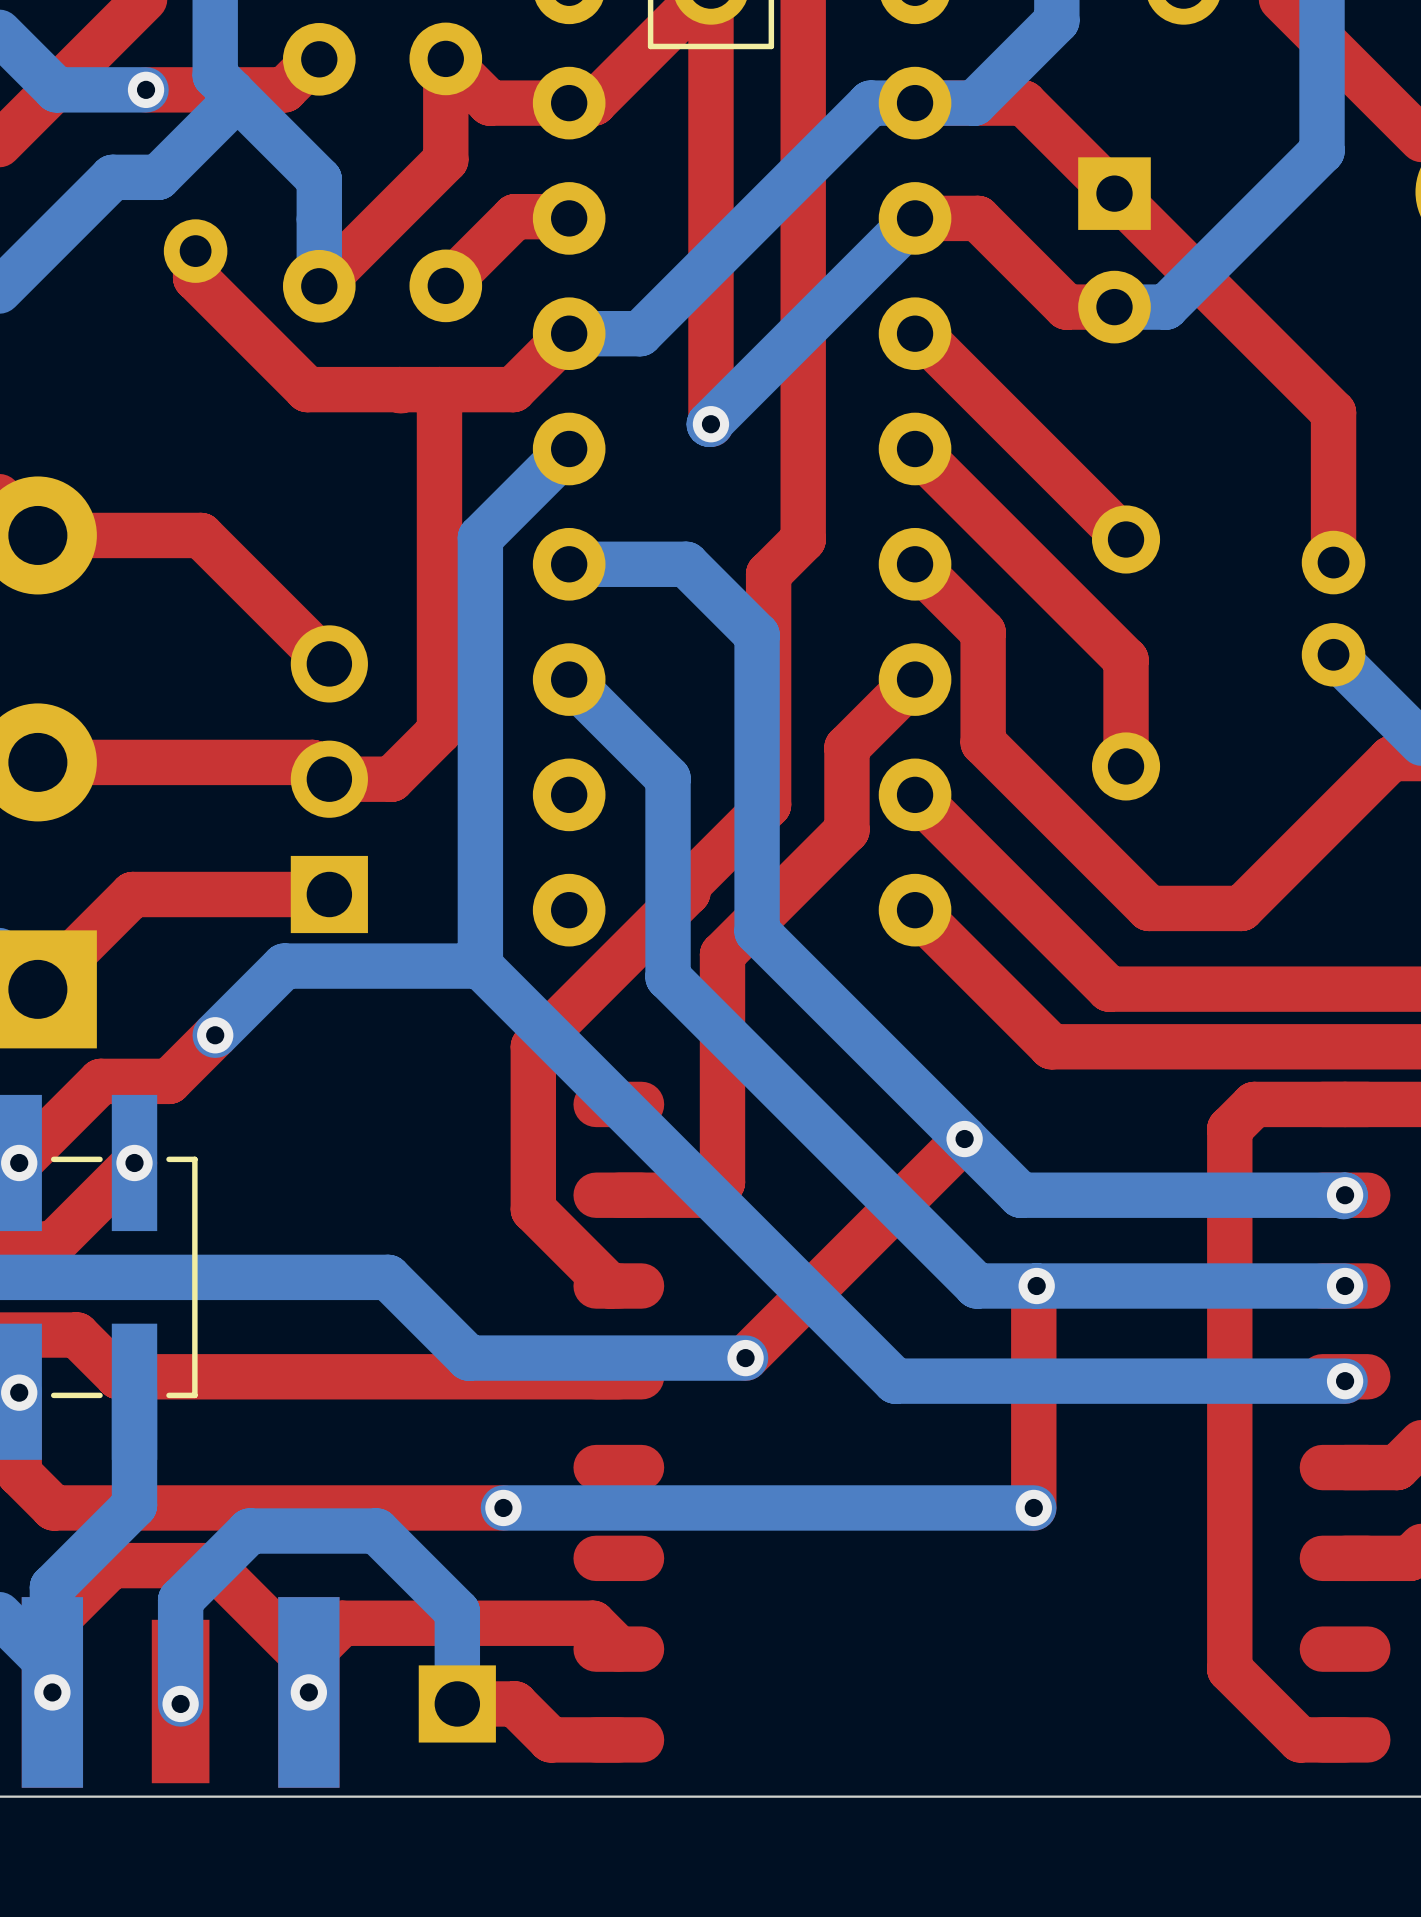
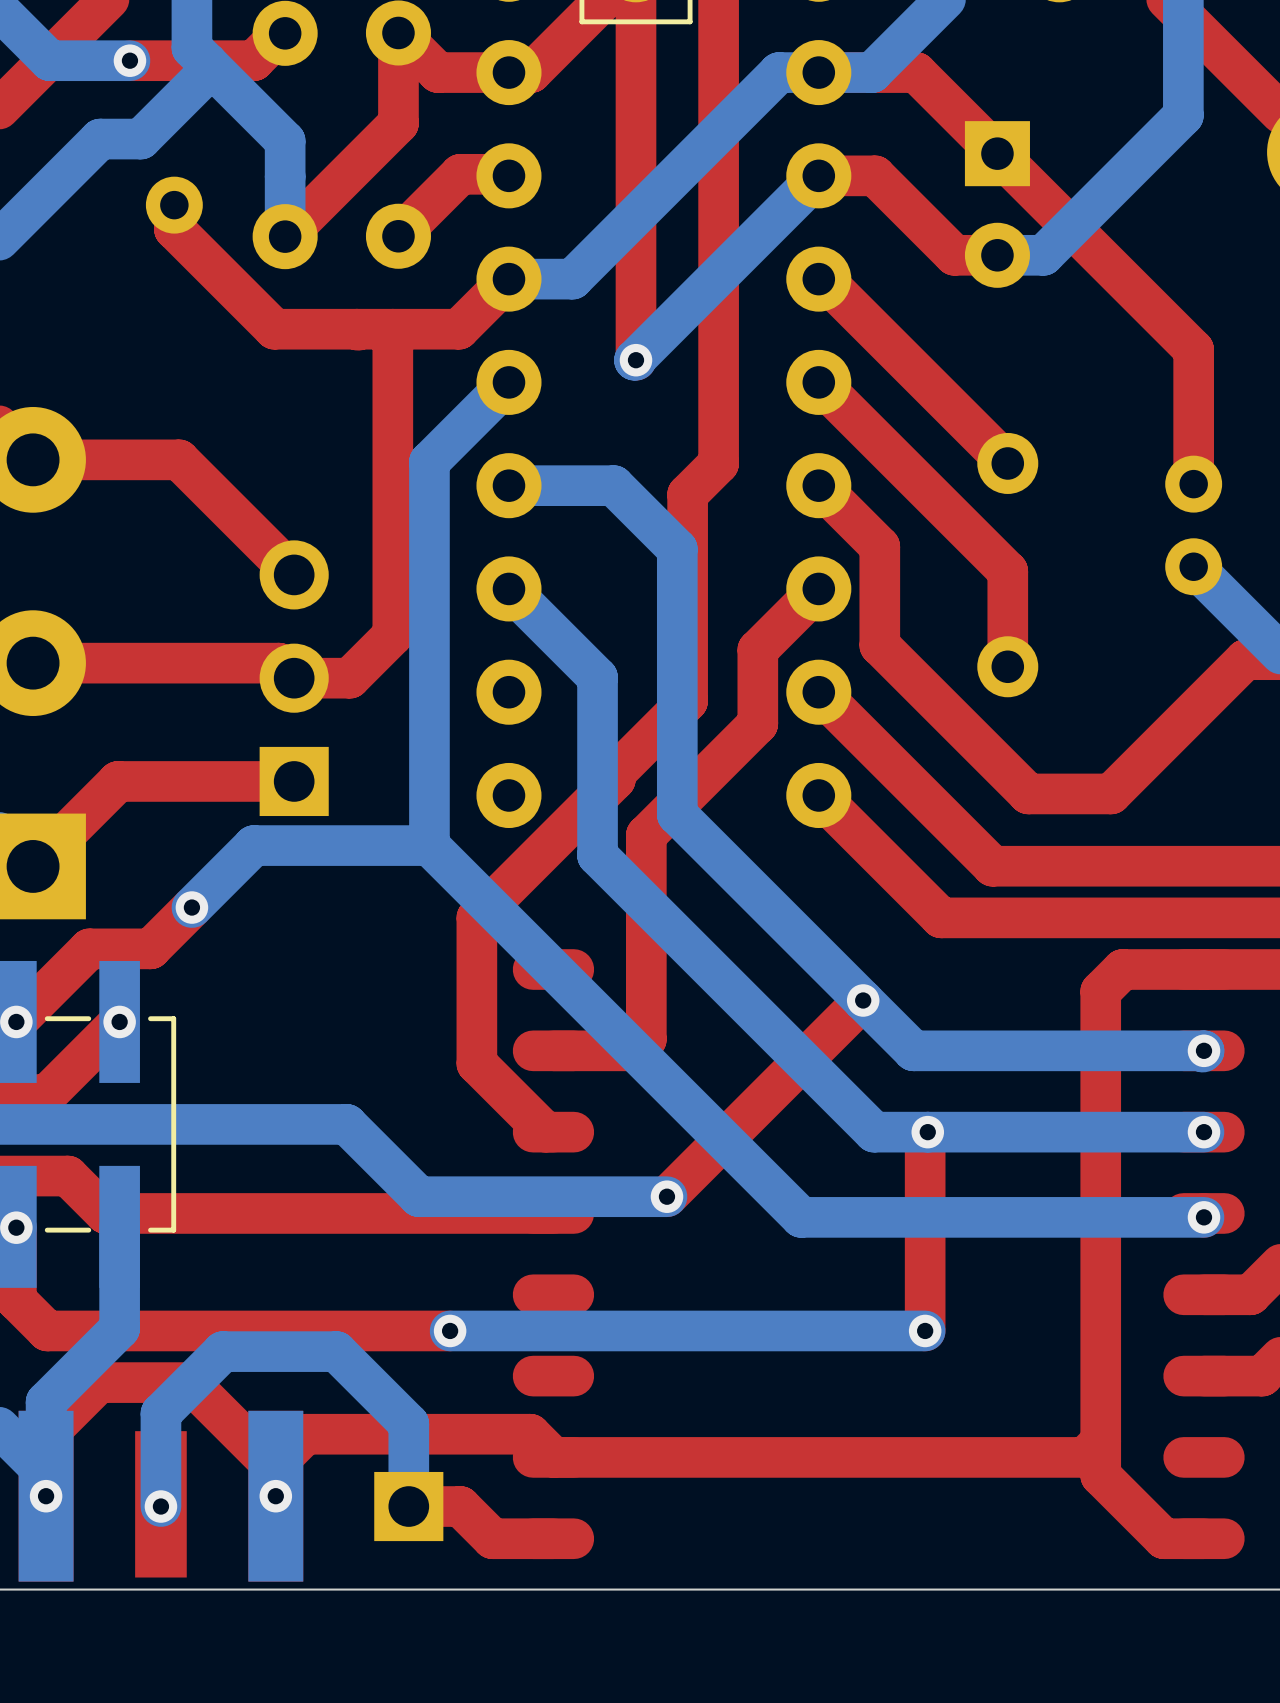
top track: none -> (1100, 1441) (1084, 1457) (553, 1457)

